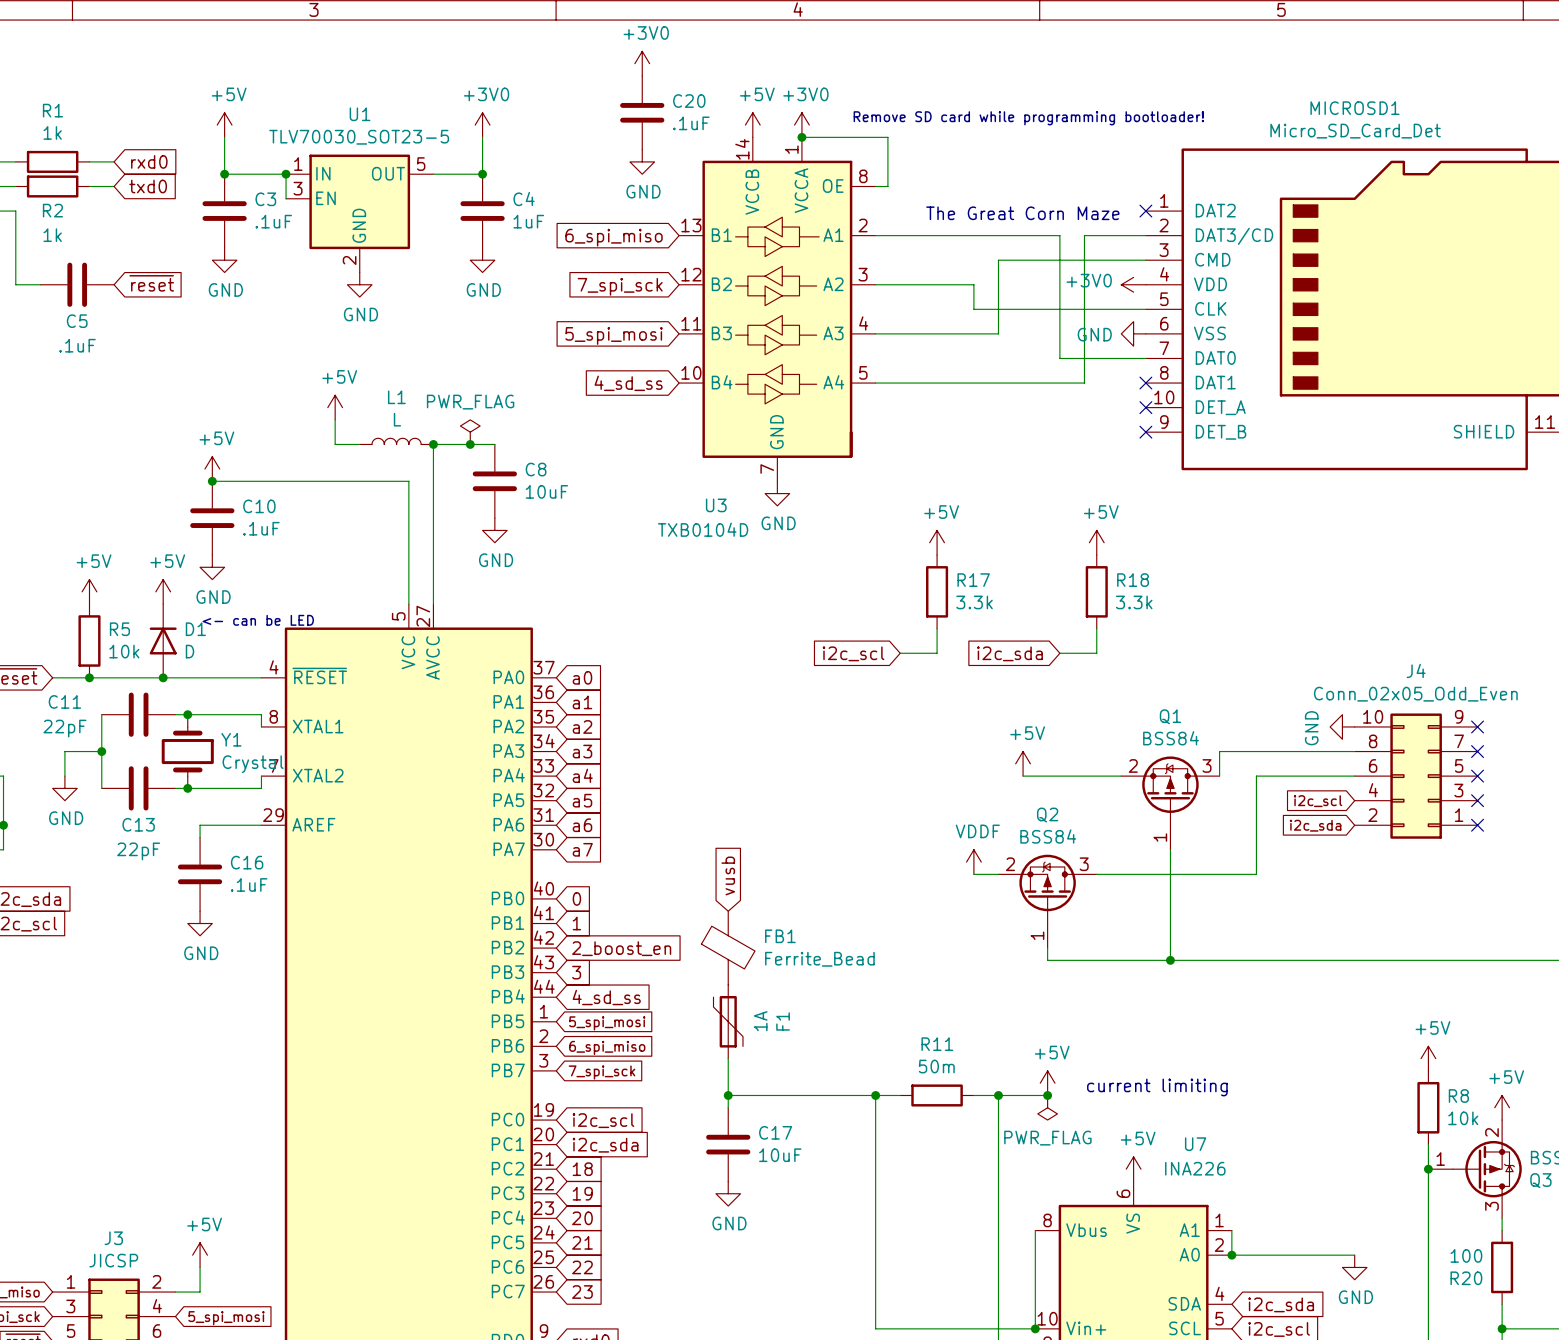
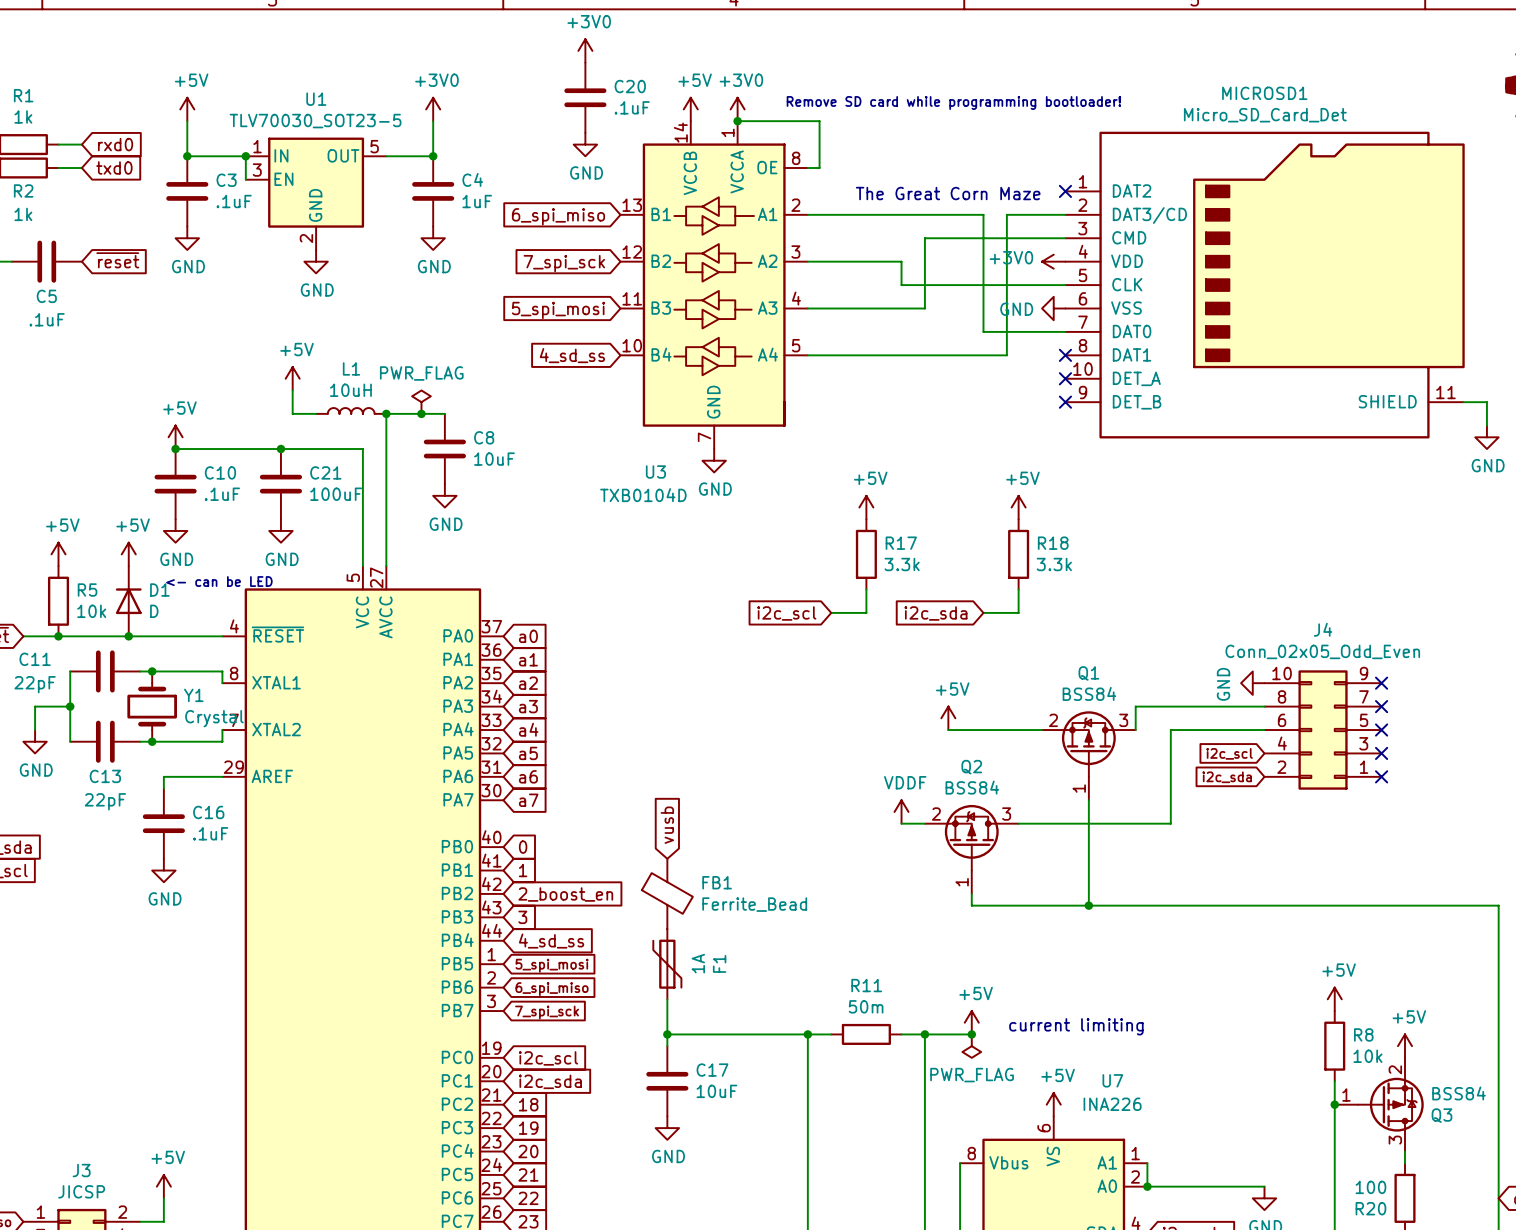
L1 value: L (397, 419) -> 10uH (350, 390)
junction: none -> (280, 449)
C21: none -> 100uF (280, 484)
power symbol: none -> GND (280, 530)

